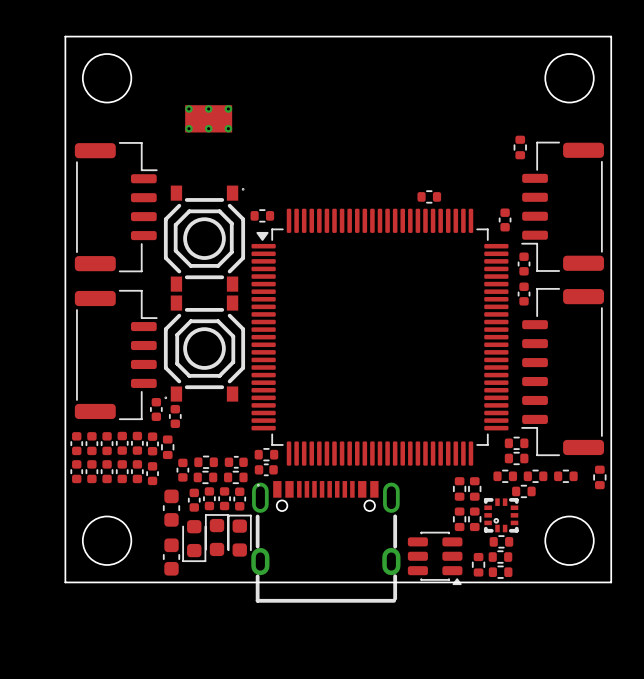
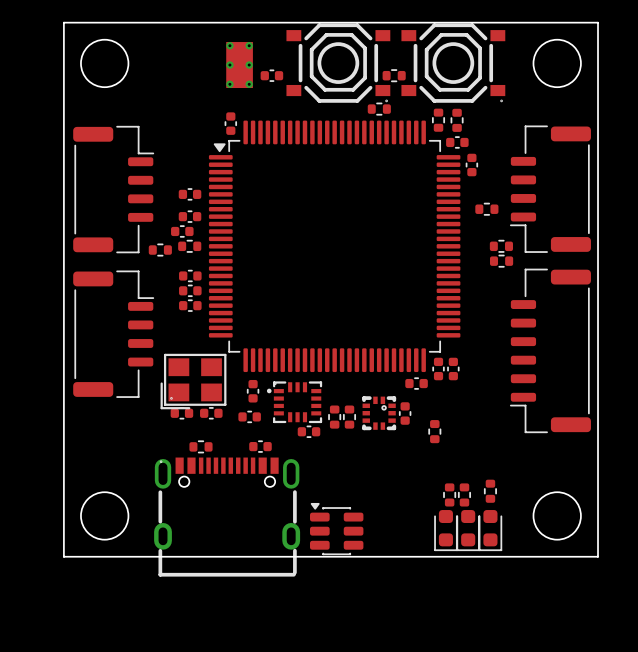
part: none -> (338, 63)
part: none -> (453, 63)
part: none -> (271, 75)
part: none -> (394, 75)
part rotation: 0° (208, 118) -> 90° clockwise (239, 65)
part position: (208, 118) -> (239, 65)
part: none -> (379, 109)
part: none -> (438, 120)
part: none -> (457, 120)
part: none -> (230, 123)
part: (520, 147) -> none
part: none -> (457, 142)
part: none -> (471, 165)
part: (429, 196) -> none
part footprint: [498, 208, 512, 232] -> [475, 202, 499, 216]
part: none -> (190, 194)
part: (262, 215) -> none
part: none -> (190, 216)
part: (204, 238) -> none
part: none -> (182, 231)
part: (524, 264) -> none
part: none -> (189, 246)
part: none -> (501, 246)
part: none -> (160, 250)
part: none -> (501, 261)
part: (524, 294) -> none
part: none -> (190, 275)
part: none -> (190, 290)
part: none -> (190, 305)
part position: (379, 337) -> (334, 246)
part: (204, 348) -> none
part: none -> (438, 369)
part: none -> (453, 369)
part: none -> (193, 381)
part: none -> (416, 383)
part: (156, 409) -> none
part: none -> (253, 391)
part: (175, 416) -> none
part: none -> (294, 402)
part: none -> (181, 413)
part: none -> (211, 413)
part: none -> (379, 413)
part: none -> (405, 413)
part: none -> (249, 416)
part: none -> (334, 417)
part: none -> (349, 417)
part: (76, 443) -> none
part: (91, 443) -> none
part: (107, 443) -> none
part: (122, 443) -> none
part: (137, 443) -> none
part: (152, 443) -> none
part: (516, 443) -> none
part: (167, 447) -> none
part: (266, 454) -> none
part: none -> (309, 431)
part: none -> (434, 431)
part: (516, 458) -> none
part: (206, 462) -> none
part: (236, 462) -> none
part: (182, 470) -> none
part: none -> (200, 446)
part: (76, 471) -> none
part: (91, 471) -> none
part: (107, 471) -> none
part: (122, 471) -> none
part: (137, 471) -> none
part: (152, 473) -> none
part: (505, 476) -> none
part: (535, 476) -> none
part: (565, 476) -> none
part: (205, 477) -> none
part: (235, 477) -> none
part: (599, 477) -> none
part: (459, 488) -> none
part: (474, 488) -> none
part: (523, 491) -> none
part footprint: [483, 497, 519, 533] -> [483, 479, 497, 503]
part: (209, 498) -> none
part: (224, 498) -> none
part: (239, 499) -> none
part: (194, 500) -> none
part: (171, 508) -> none
part: (217, 535) -> none
part: (239, 535) -> none
part: (194, 541) -> none
part position: (325, 541) -> (227, 517)
part: (501, 541) -> none
part footprint: [488, 550, 513, 564] -> [478, 510, 503, 552]
part footprint: [471, 552, 486, 577] -> [456, 510, 480, 552]
part: none -> (445, 530)
part: (171, 557) -> none
part rotation: 0° (435, 558) -> 180° (336, 529)
part position: (435, 558) -> (336, 529)
part: (500, 572) -> none

